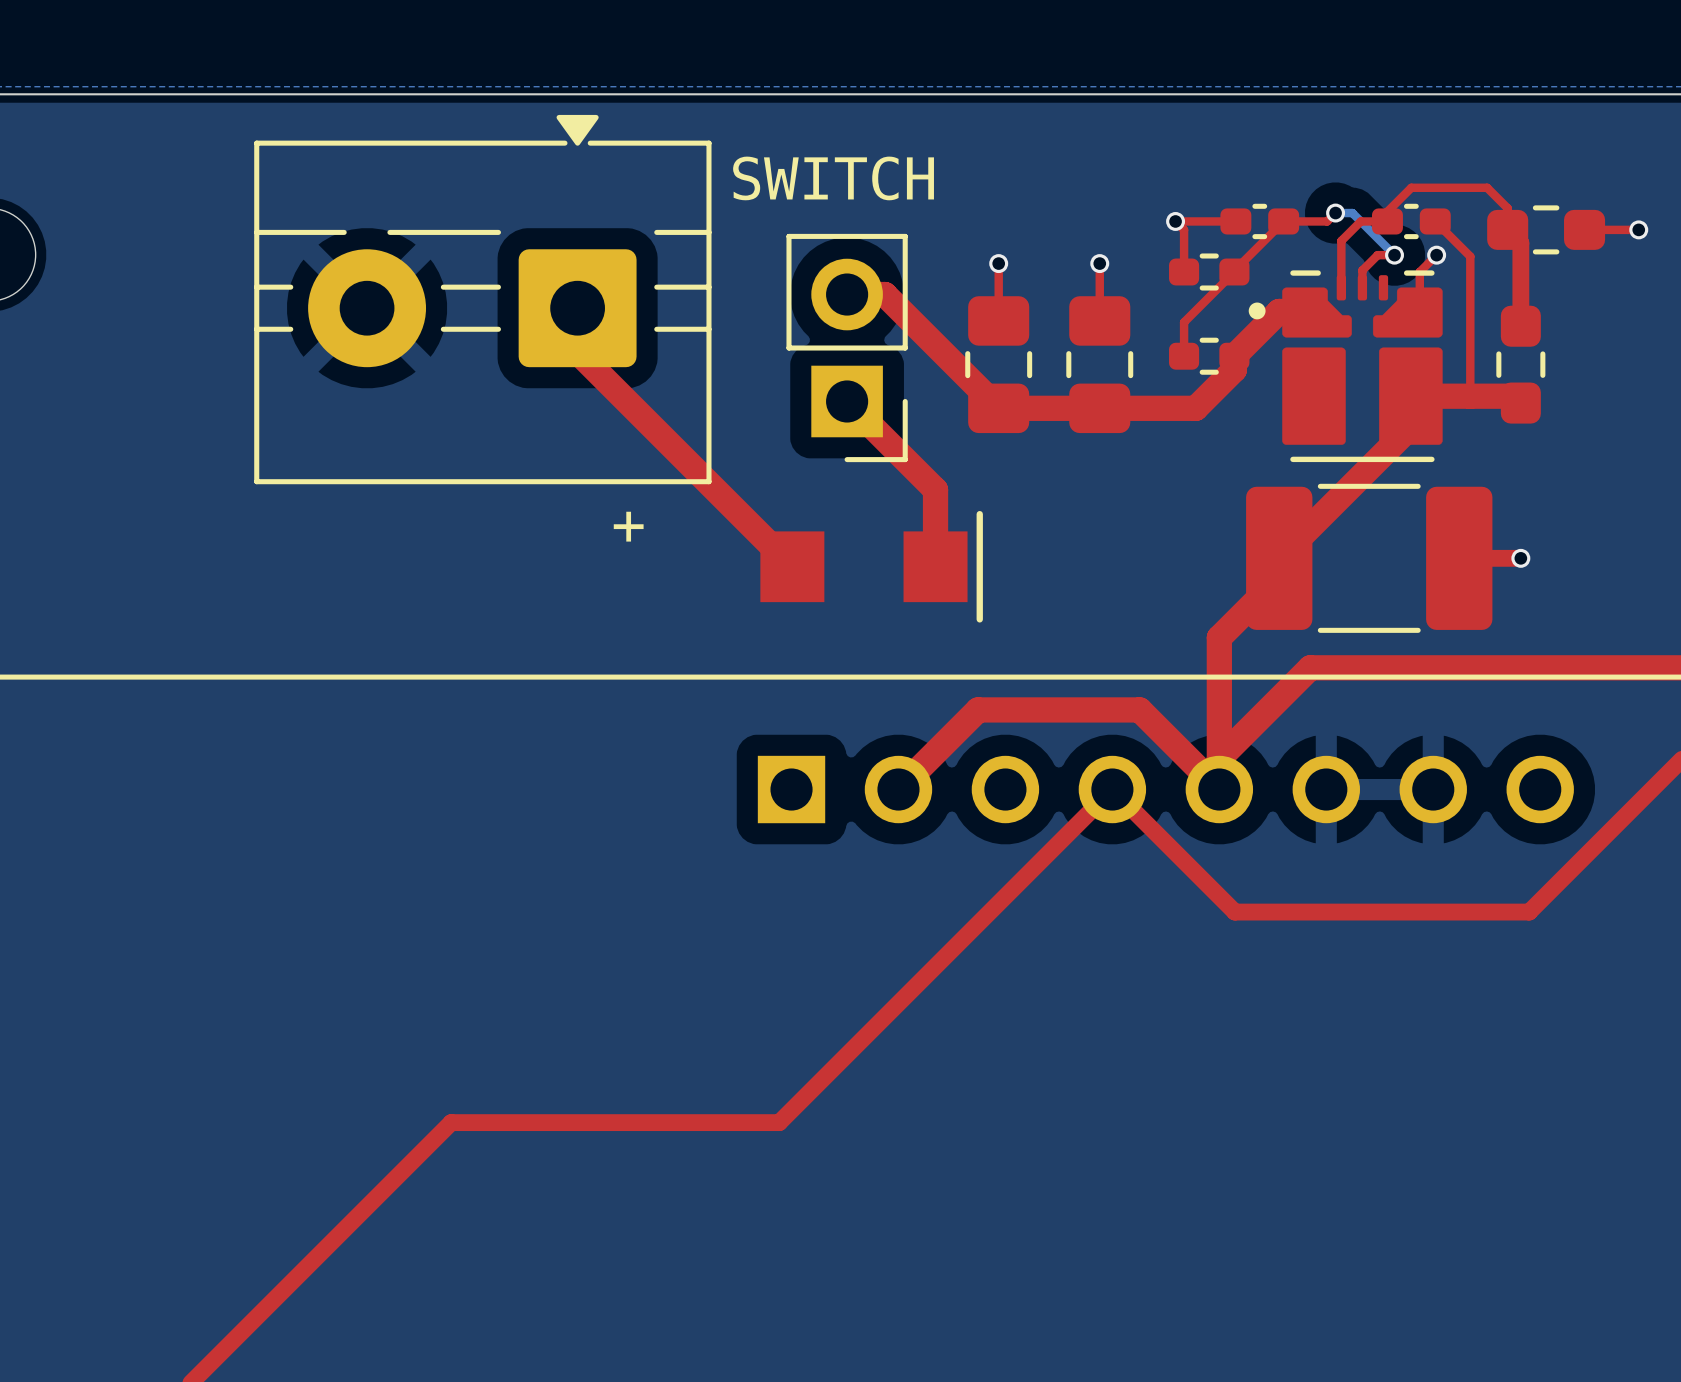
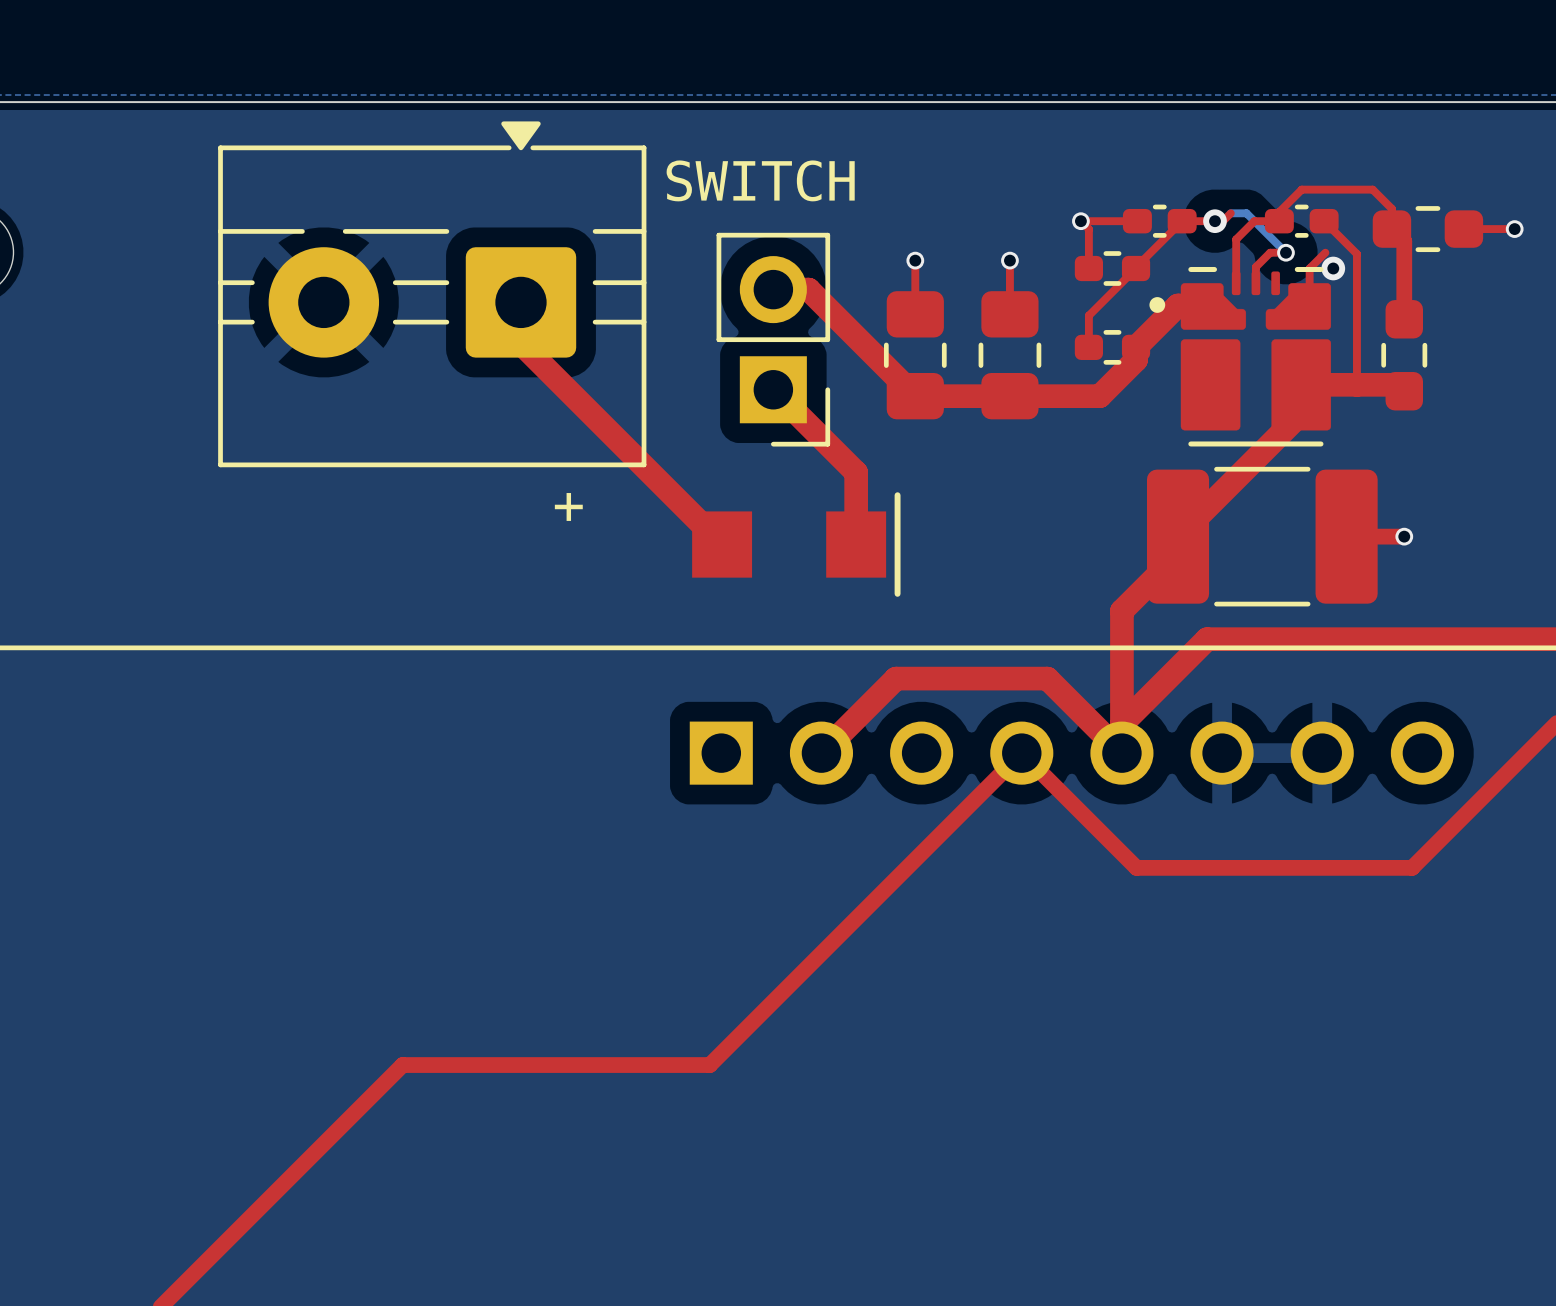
via position: (1335, 213) -> (1214, 221)
via position: (1436, 255) -> (1333, 268)

